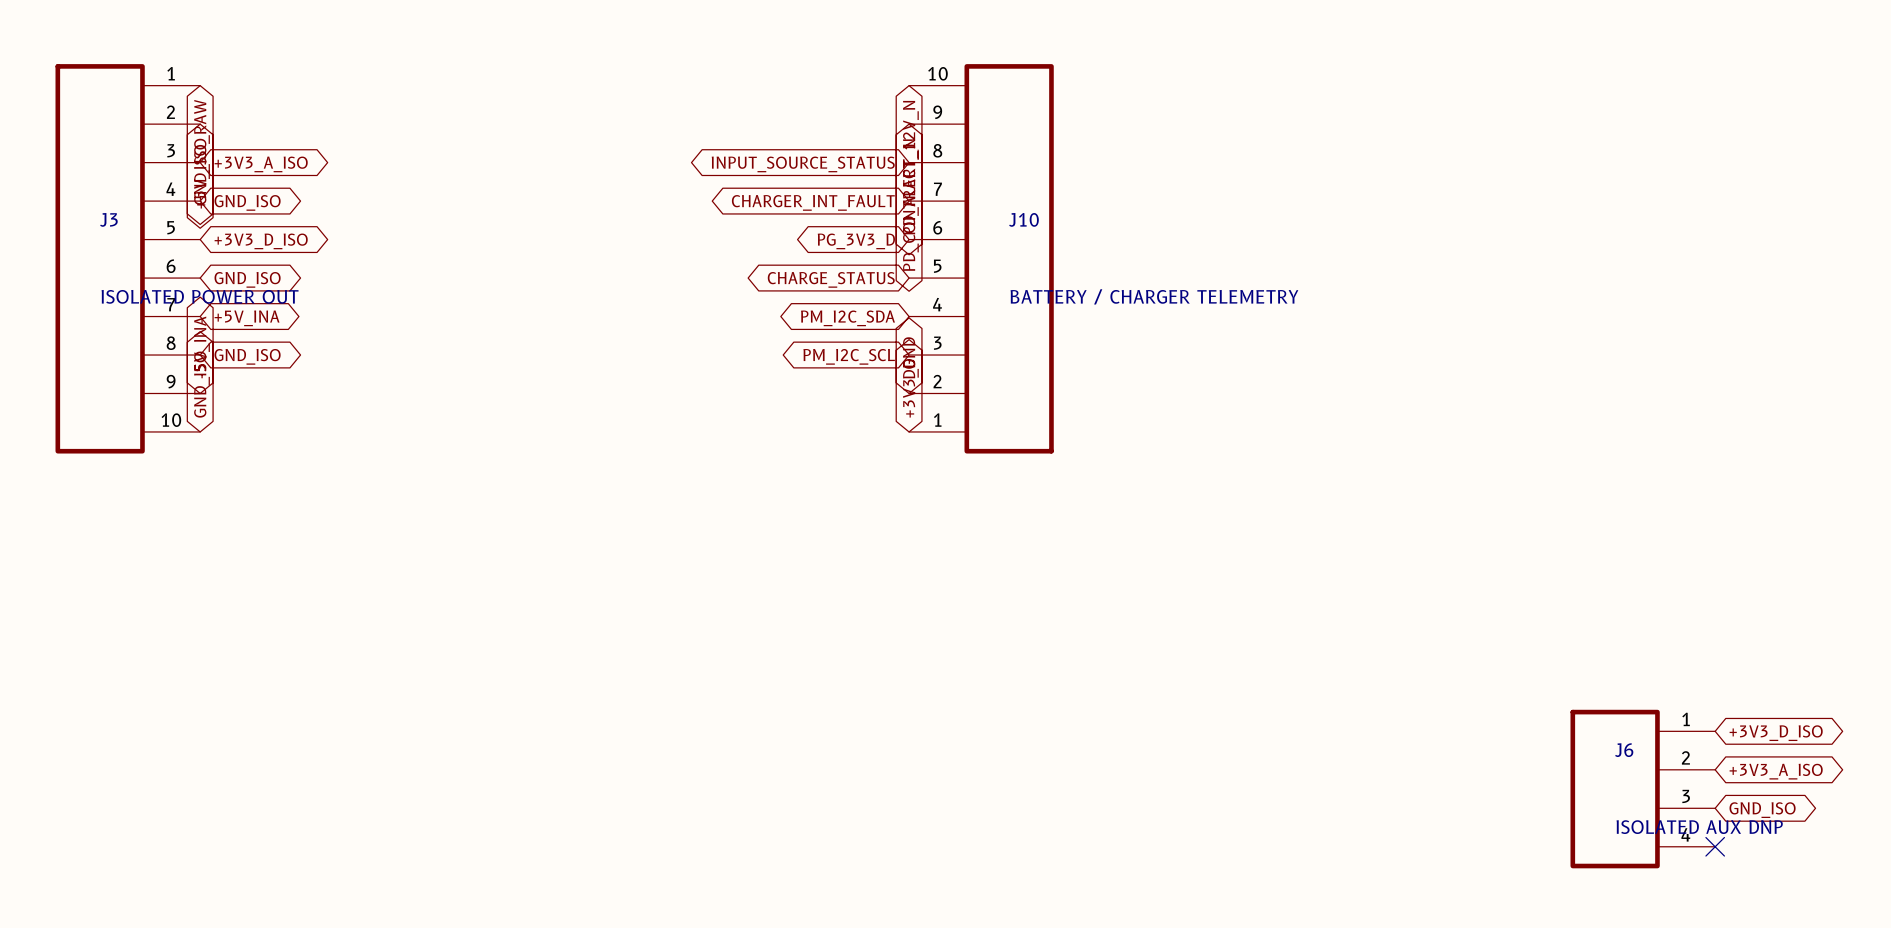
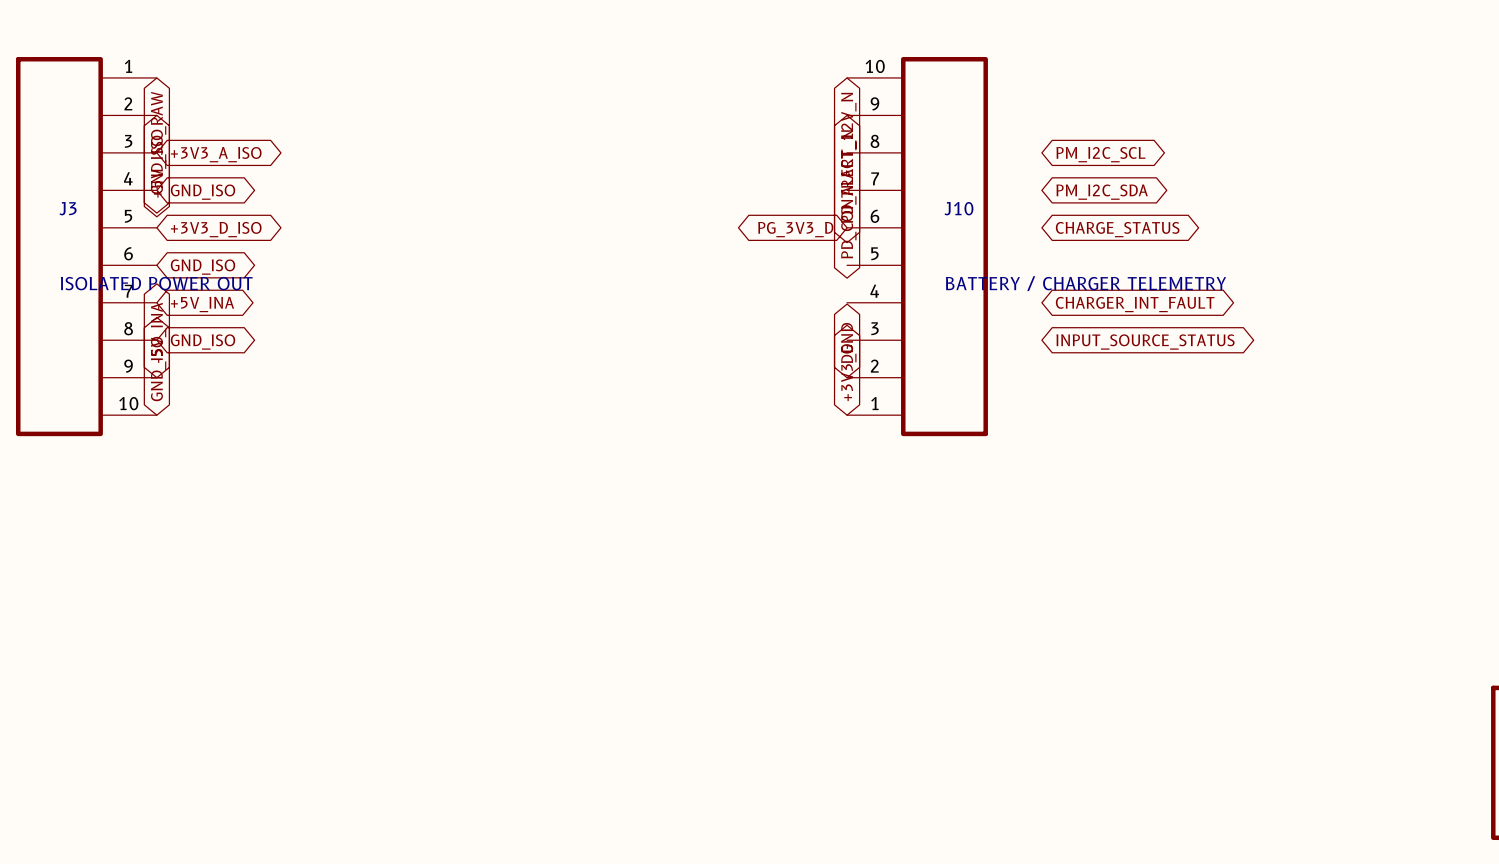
global label rotation: 0° (803, 164) -> 180° (1145, 342)
global label position: INPUT_SOURCE_STATUS (803, 164) -> INPUT_SOURCE_STATUS (1145, 342)
global label rotation: 0° (813, 202) -> 180° (1135, 304)
global label position: CHARGER_INT_FAULT (813, 202) -> CHARGER_INT_FAULT (1135, 304)
global label rotation: 0° (831, 279) -> 180° (1117, 229)
global label position: CHARGE_STATUS (831, 279) -> CHARGE_STATUS (1117, 229)
global label rotation: 0° (847, 318) -> 180° (1102, 192)
global label position: PM_I2C_SDA (847, 318) -> PM_I2C_SDA (1102, 192)
global label rotation: 0° (849, 356) -> 180° (1100, 154)
global label position: PM_I2C_SCL (849, 356) -> PM_I2C_SCL (1100, 154)

